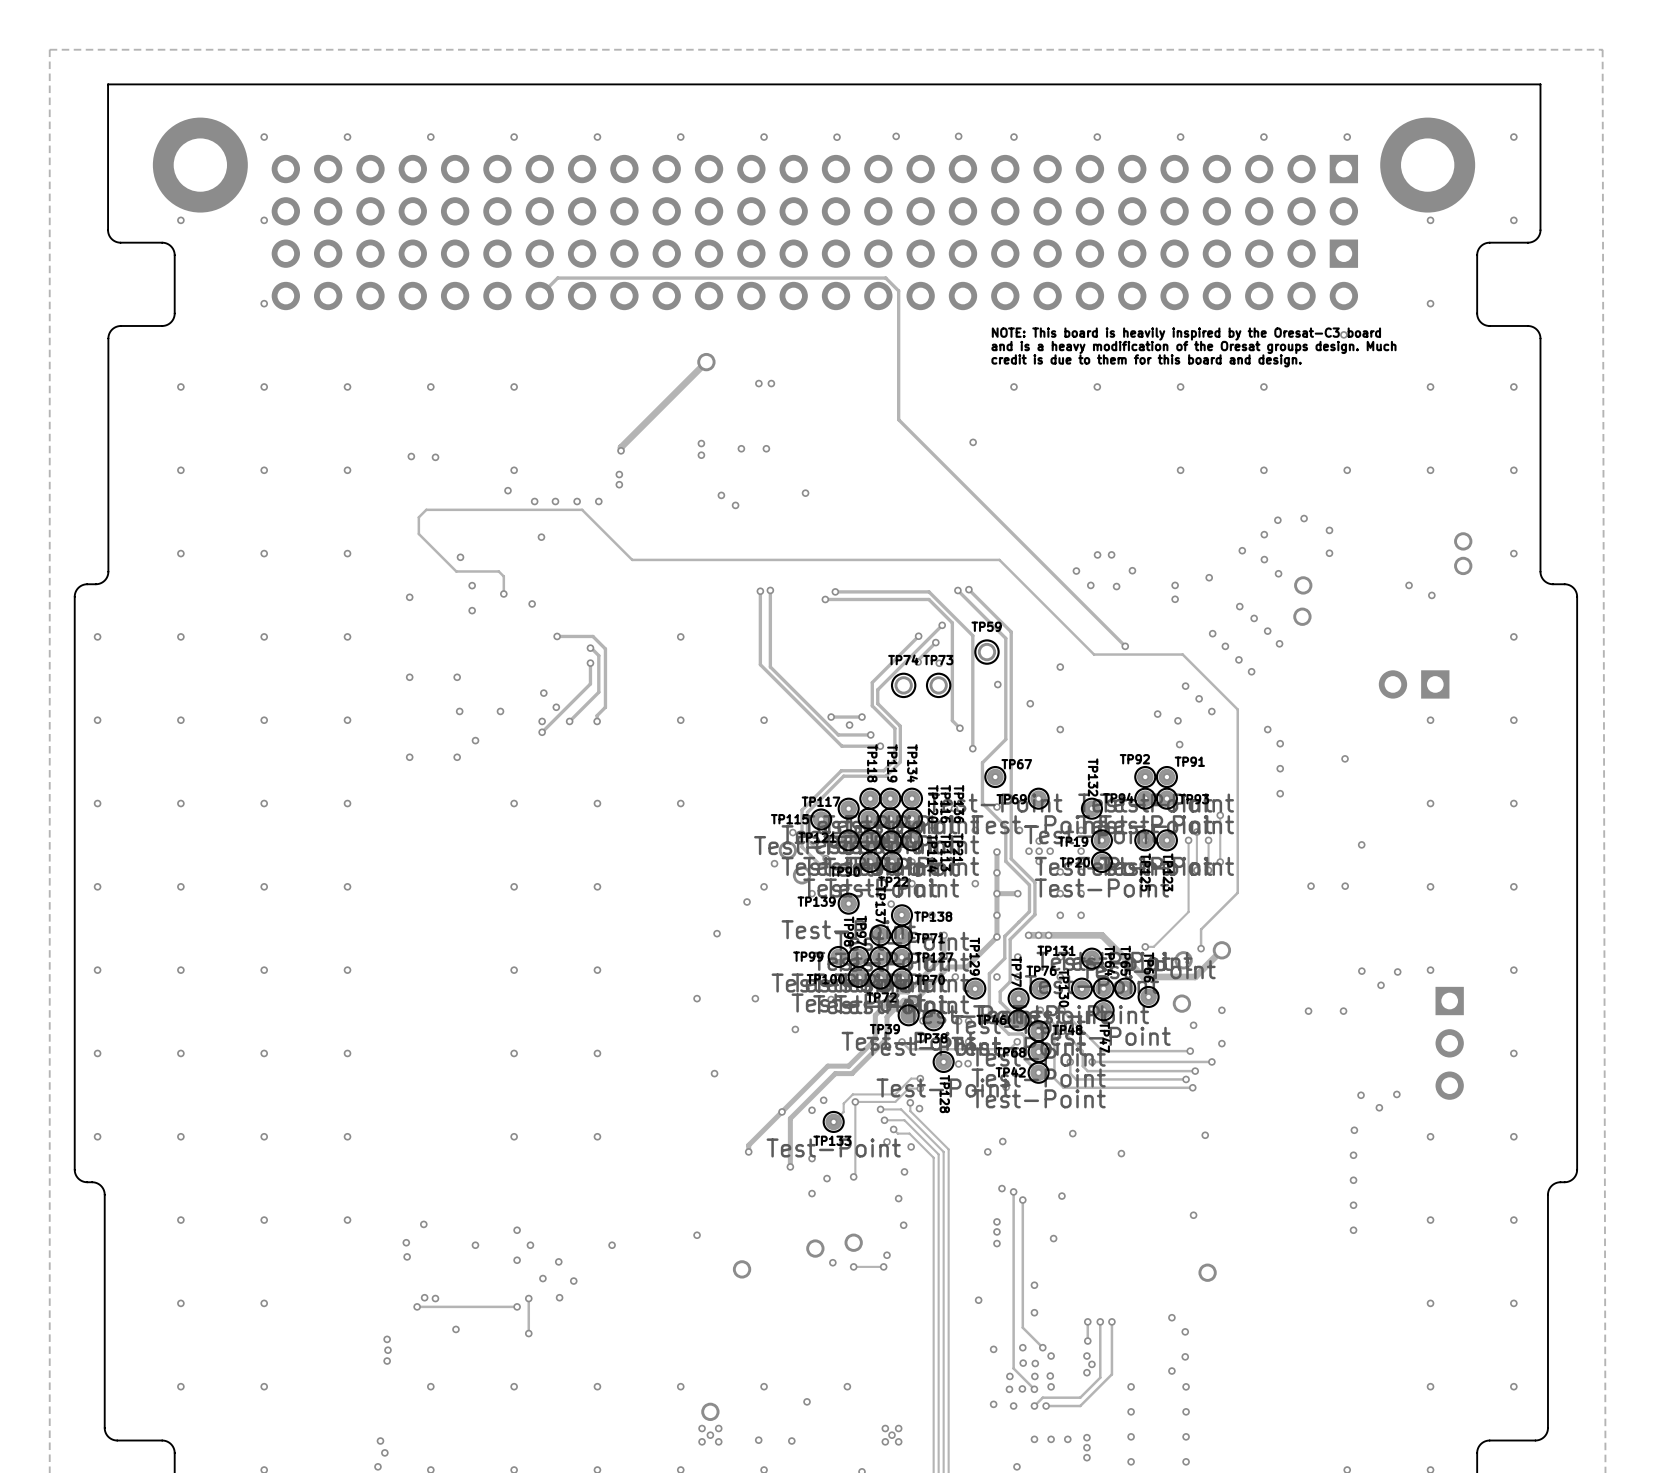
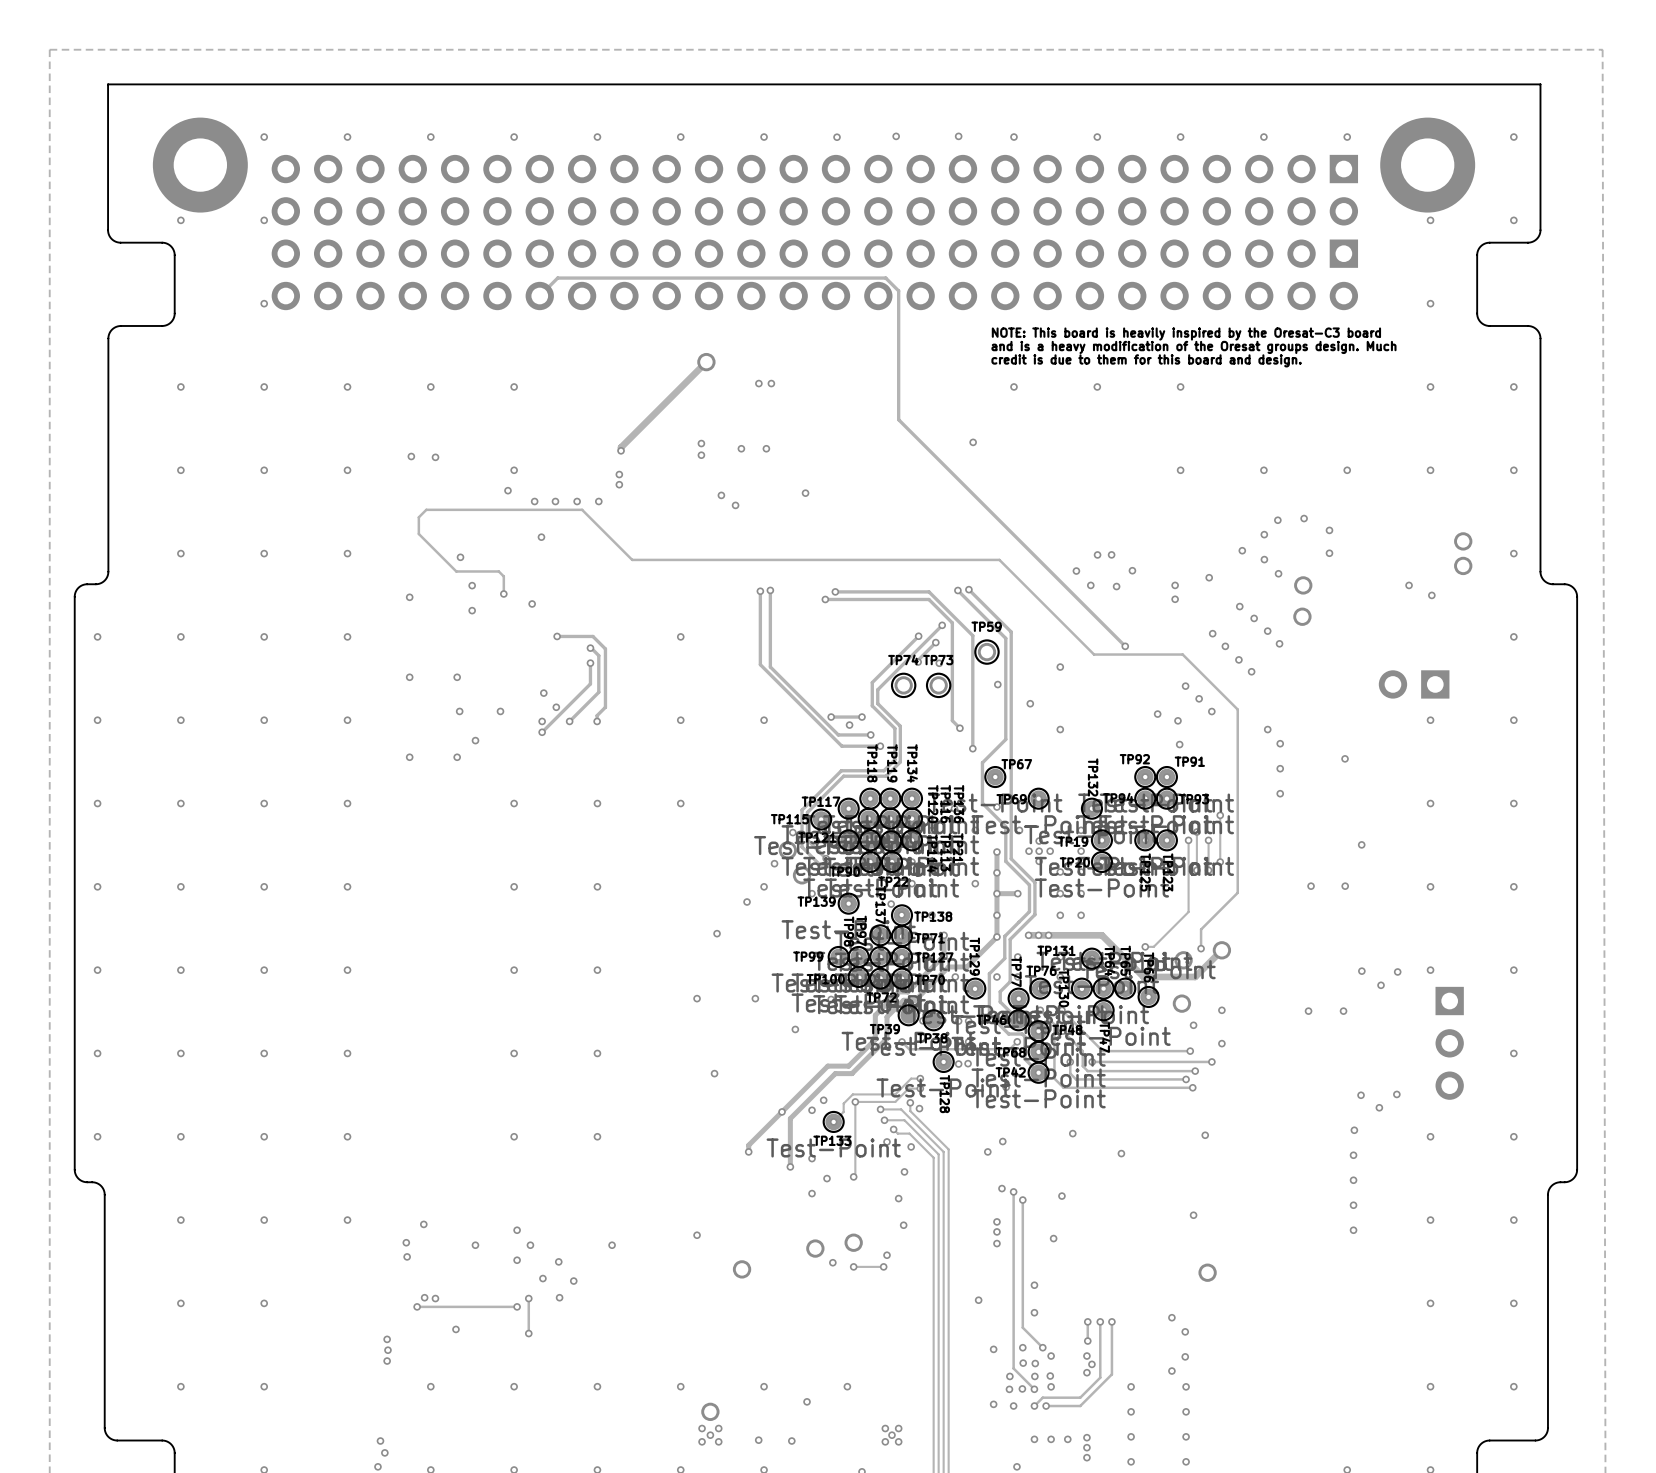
via: (1343, 334) -> none
via: (1263, 386) -> none

